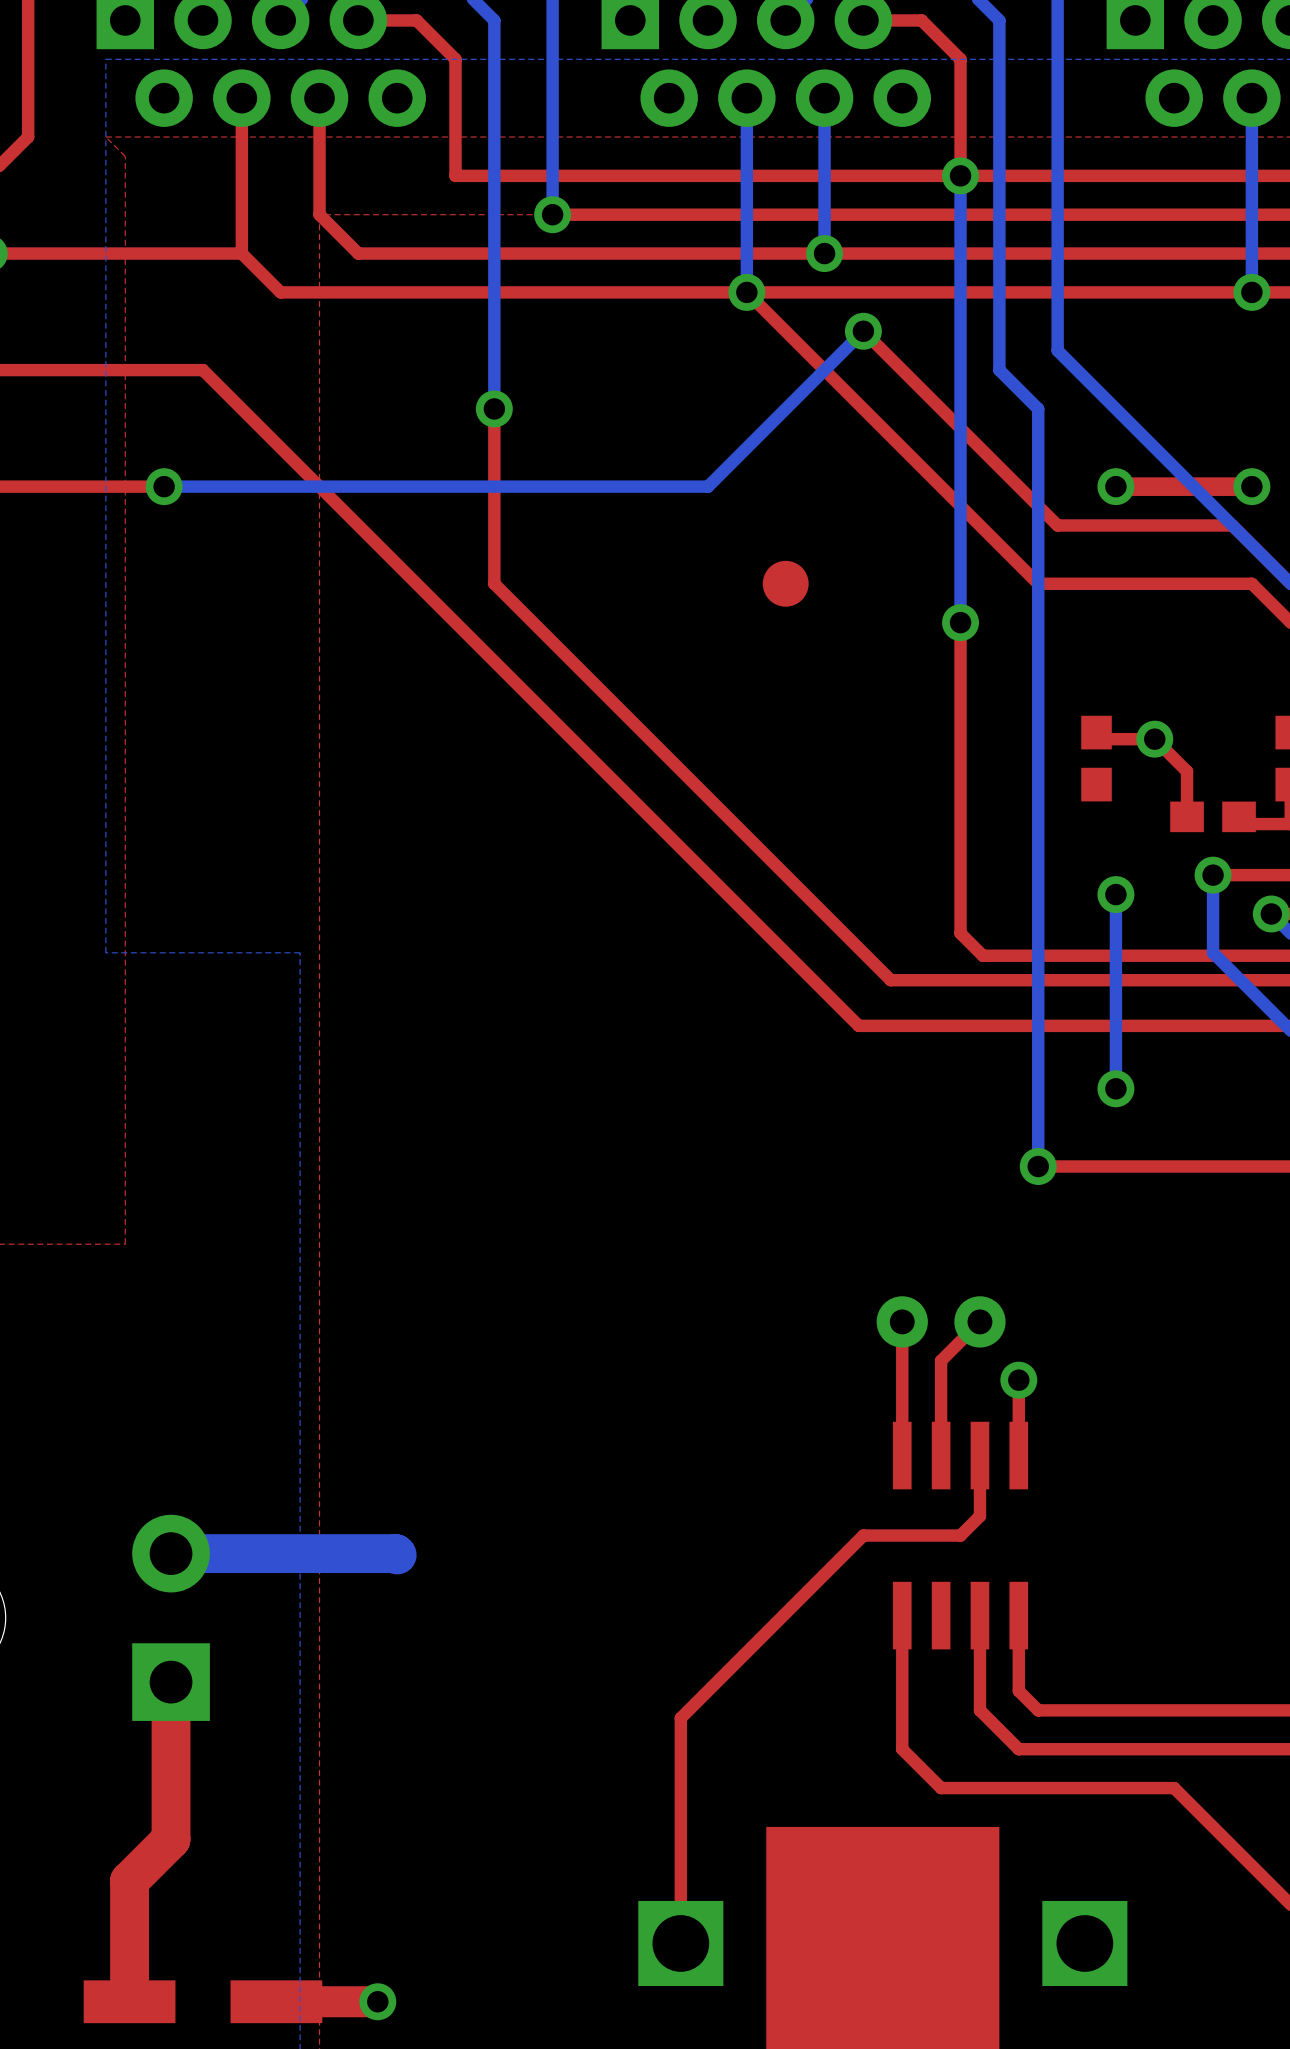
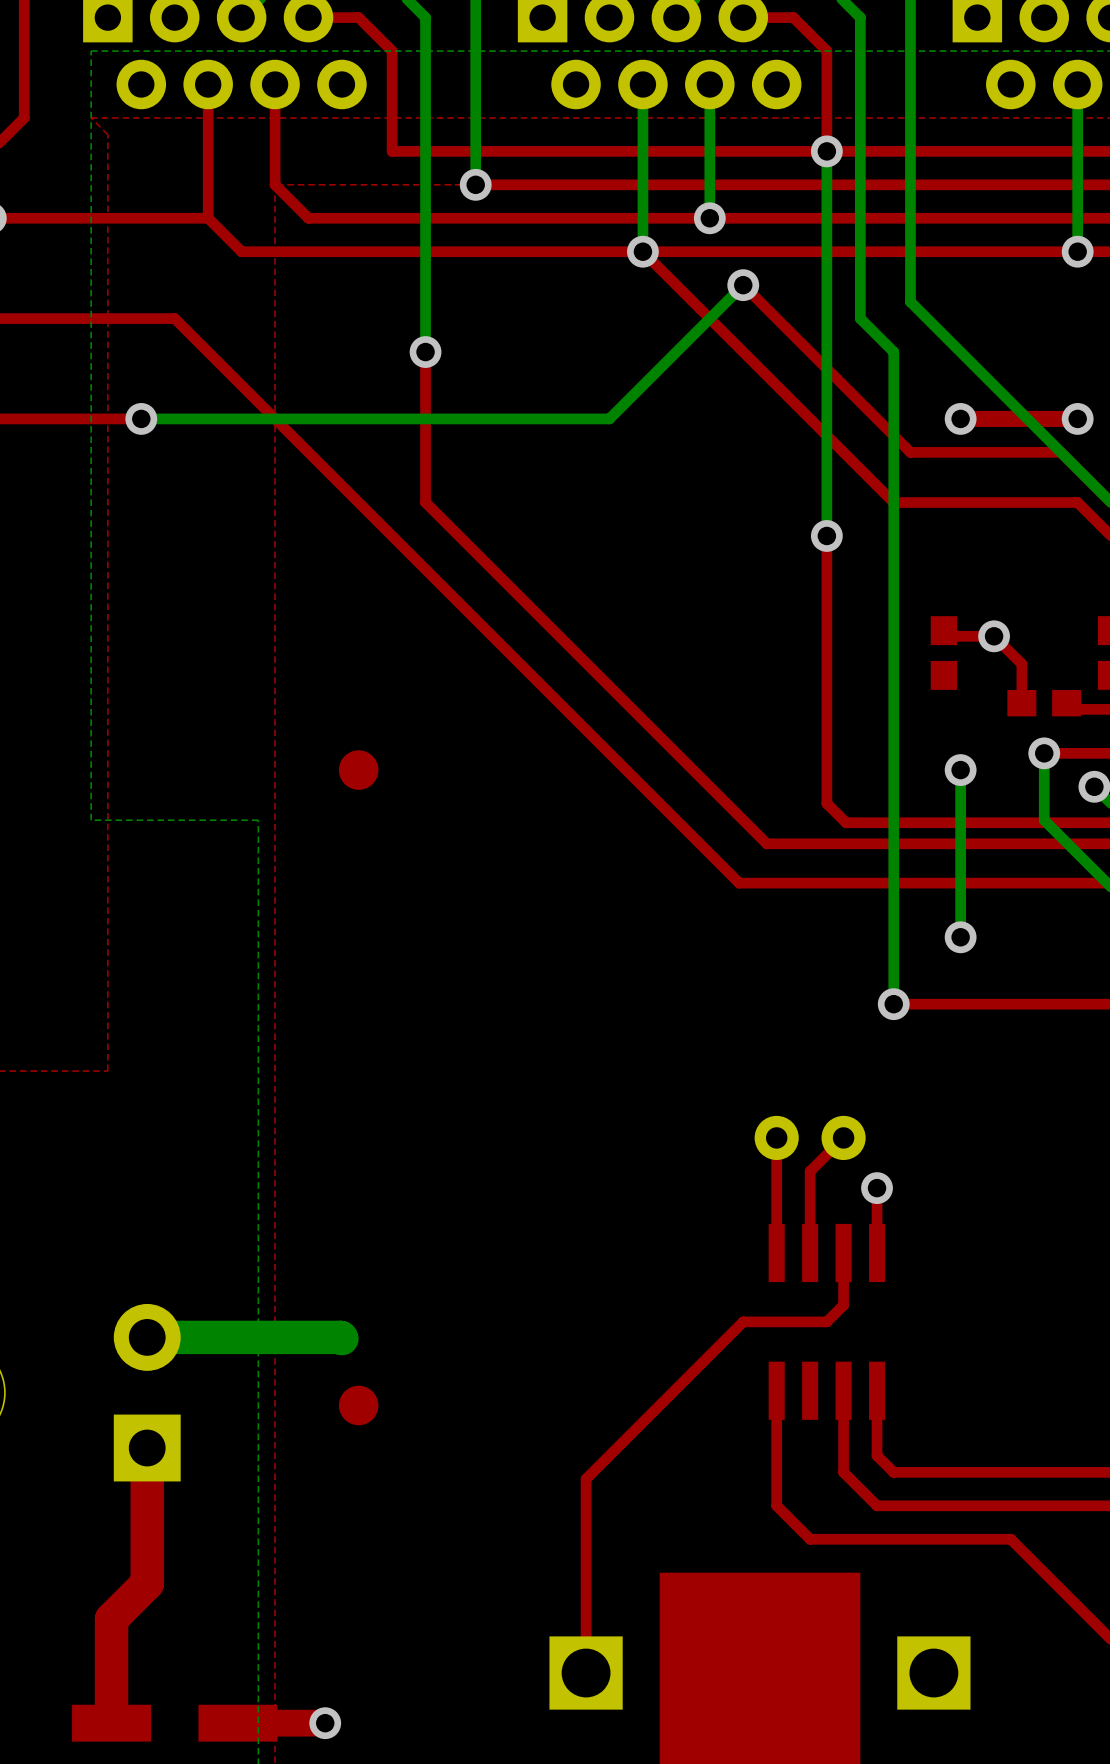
part position: (785, 583) -> (358, 770)
part: none -> (358, 1405)

